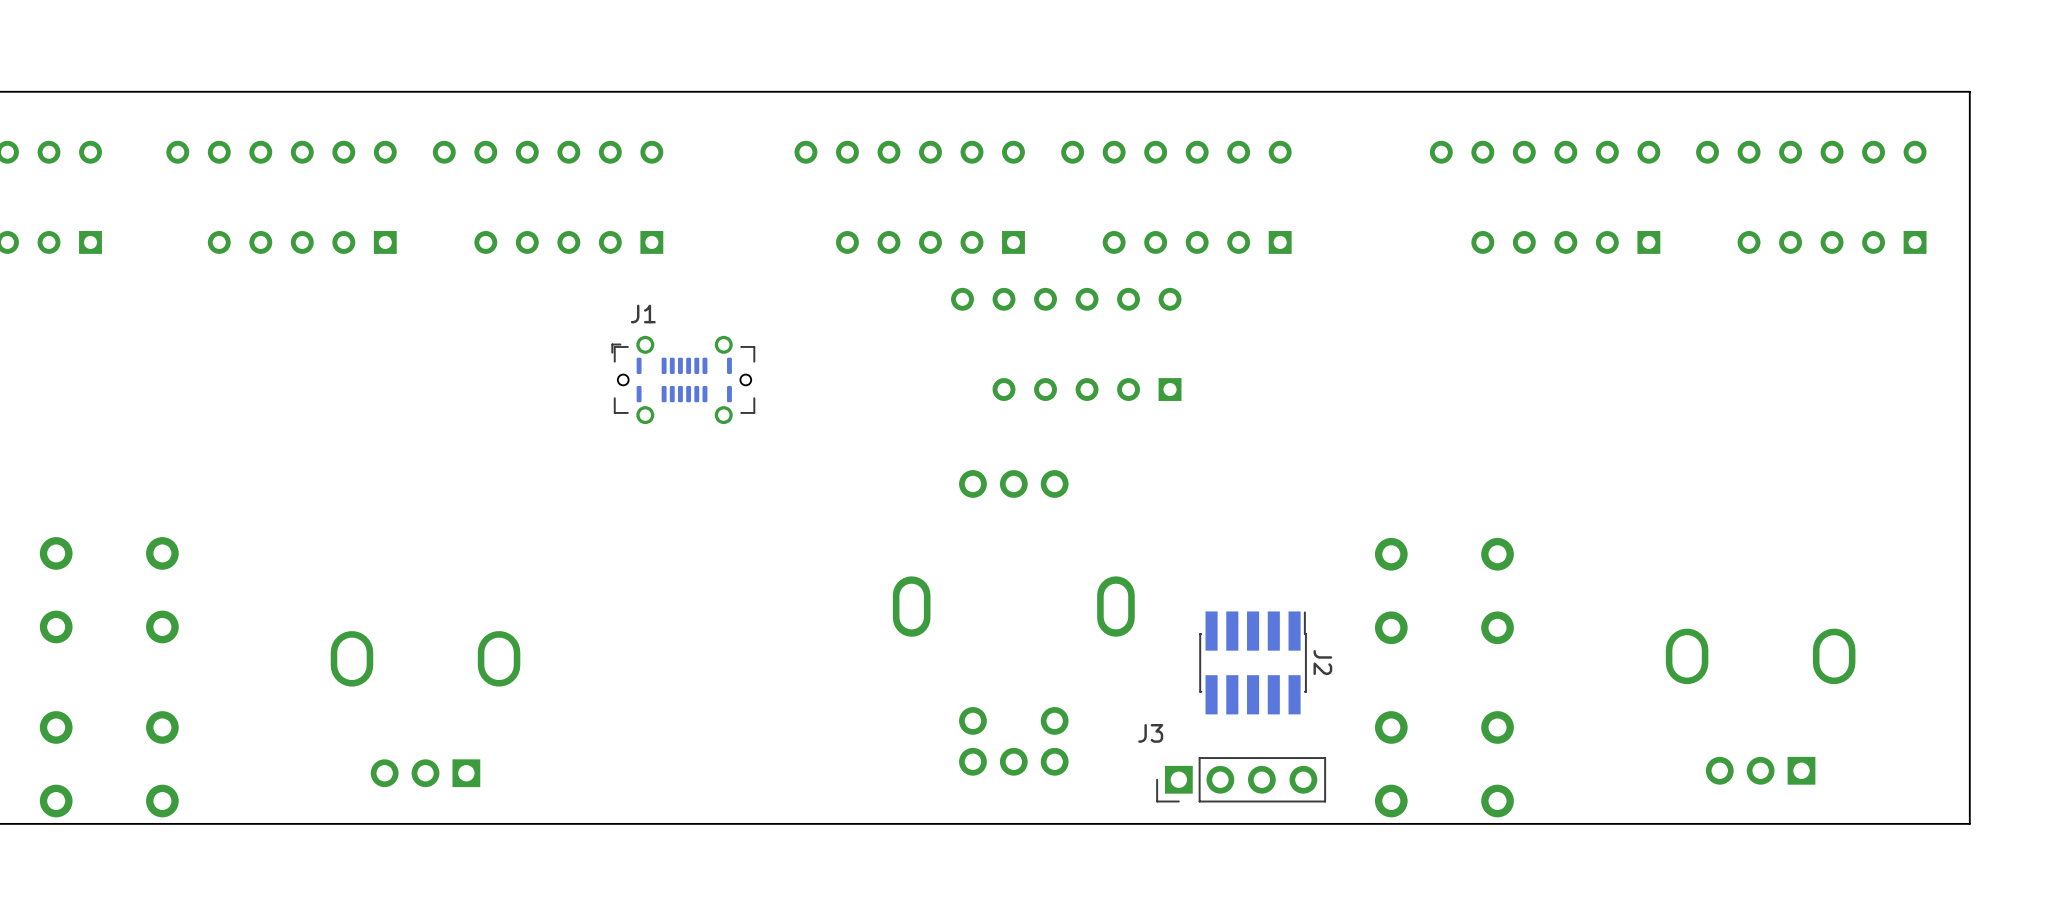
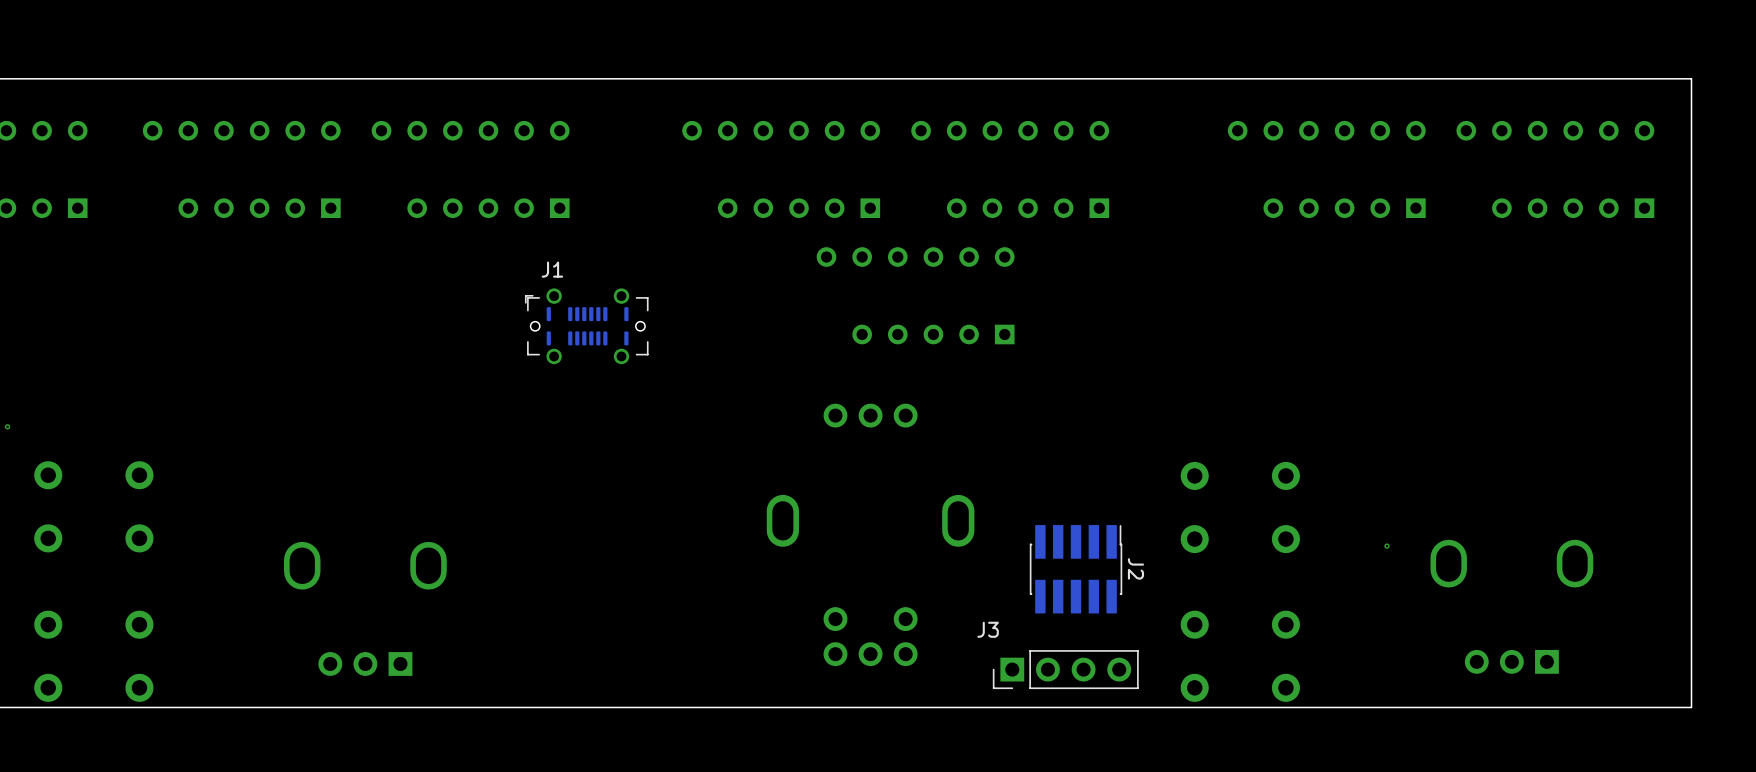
via: none -> (7, 426)
via: none -> (1386, 546)

